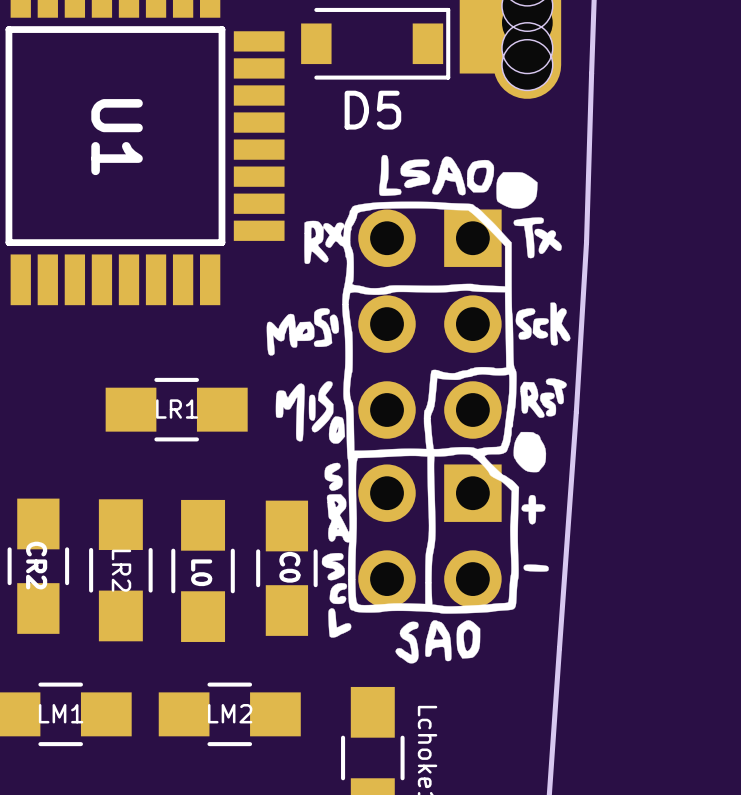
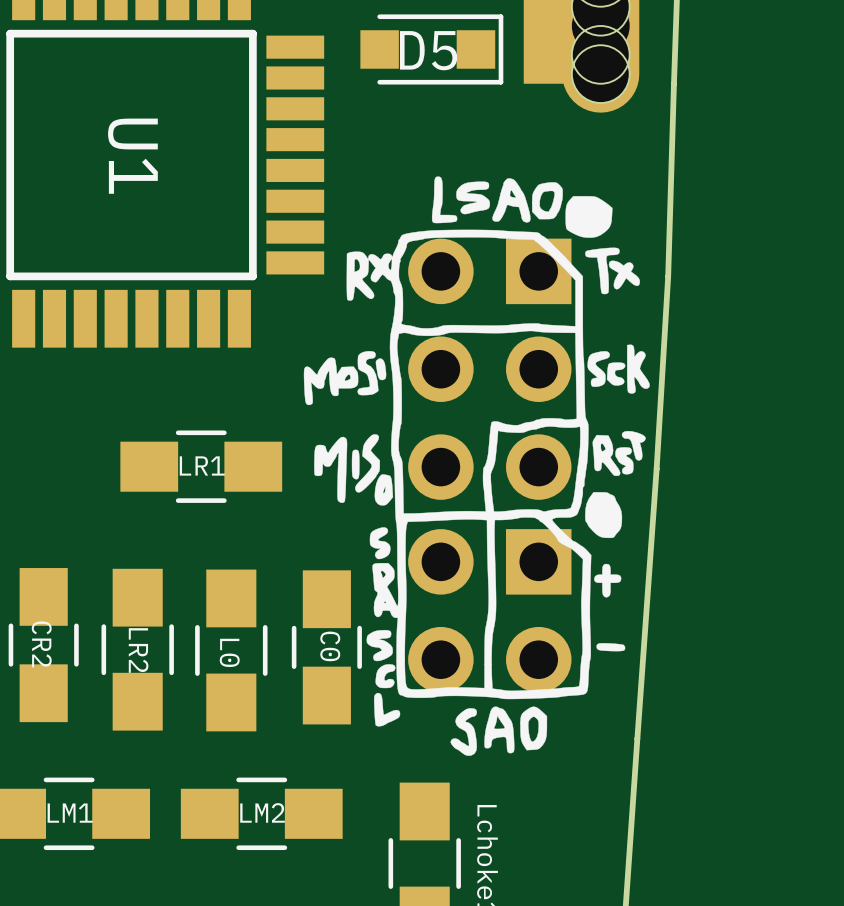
D5 footprint: [301, 7, 451, 80] -> [360, 14, 504, 85]
D5 name position: D5 (372, 110) -> D5 (428, 50)

